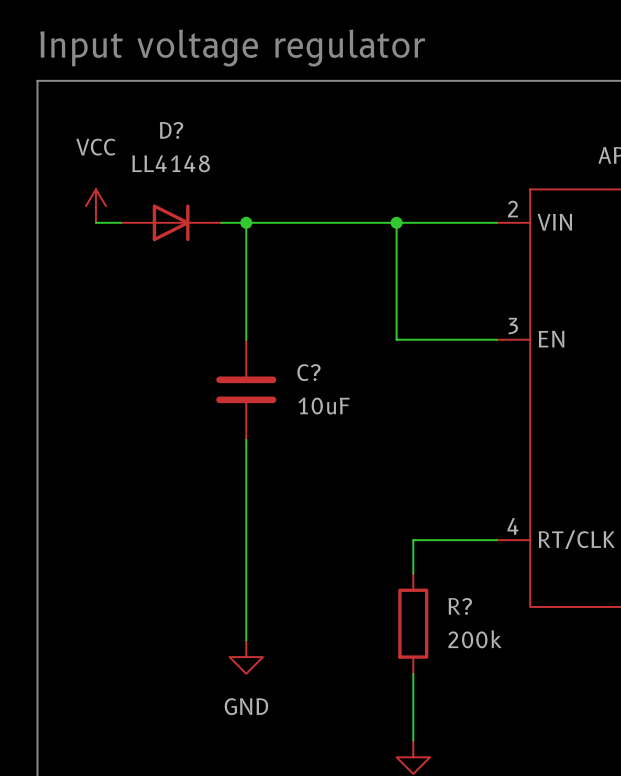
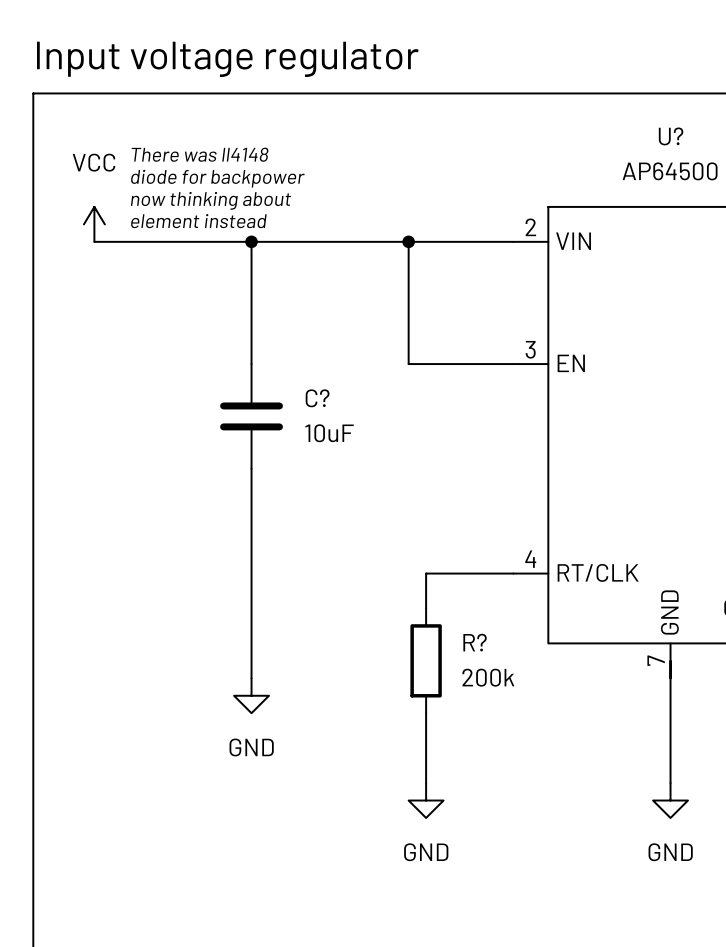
text: none -> There was ll4148 (200, 154)
text: none -> diode for backpower (217, 178)
text: none -> now thinking about (211, 200)
text: none -> element instead (198, 221)
D?: LL4148 (171, 222) -> none

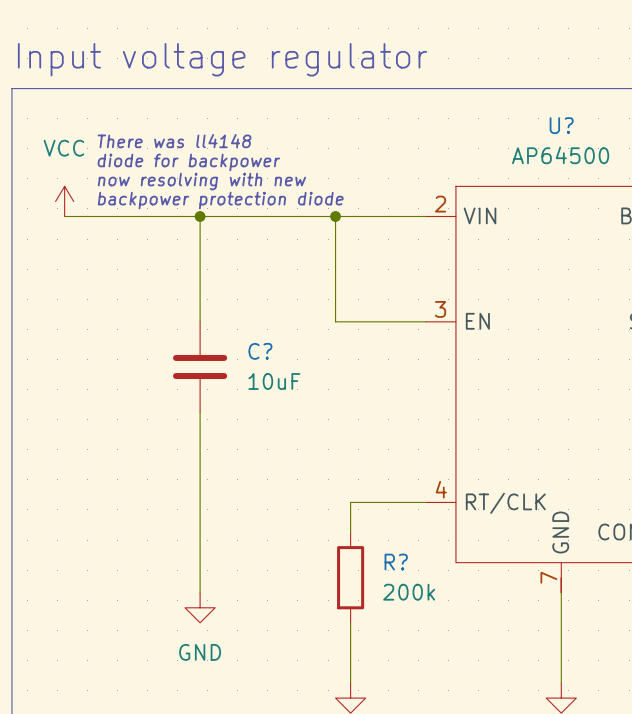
text: now thinking about (211, 200) -> now resolving with new (201, 181)
text: element instead (198, 221) -> backpower protection diode (220, 200)

